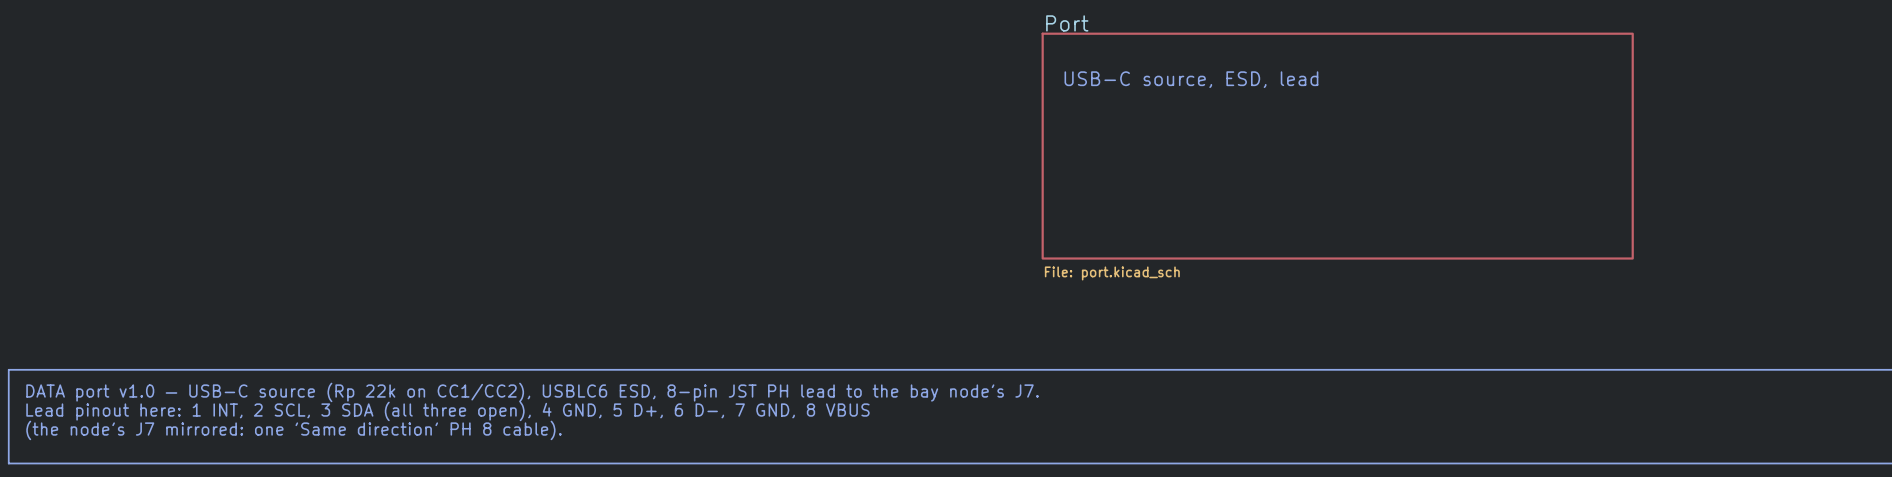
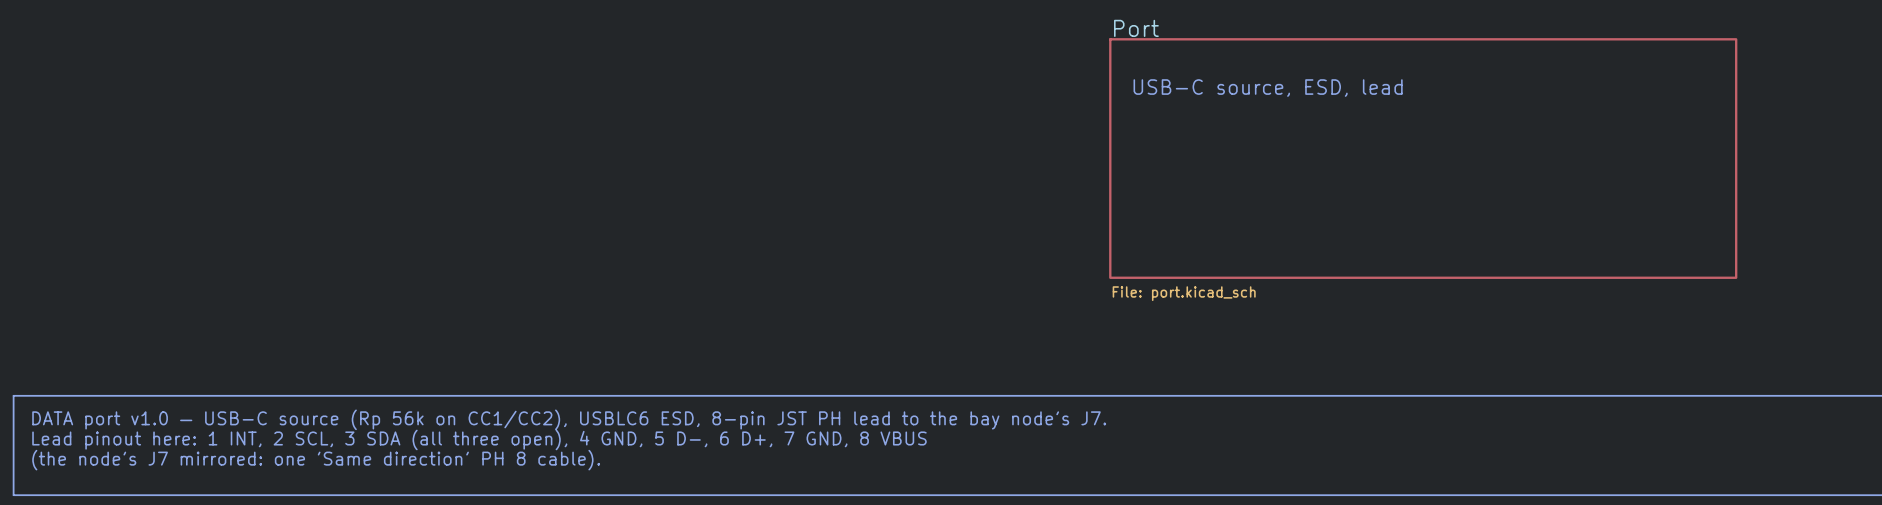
text: DATA port v1.0 — USB-C source (Rp 22k on CC1/CC2), USBLC6 ESD, 8-pin JST PH lead to the bay node's J7. (532, 392) -> DATA port v1.0 — USB-C source (Rp 56k on CC1/CC2), USBLC6 ESD, 8-pin JST PH lead to the bay node's J7. (569, 419)
text: Lead pinout here: 1 INT, 2 SCL, 3 SDA (all three open), 4 GND, 5 D+, 6 D−, 7 GND, 8 VBUS (447, 411) -> Lead pinout here: 1 INT, 2 SCL, 3 SDA (all three open), 4 GND, 5 D−, 6 D+, 7 GND, 8 VBUS (479, 439)

